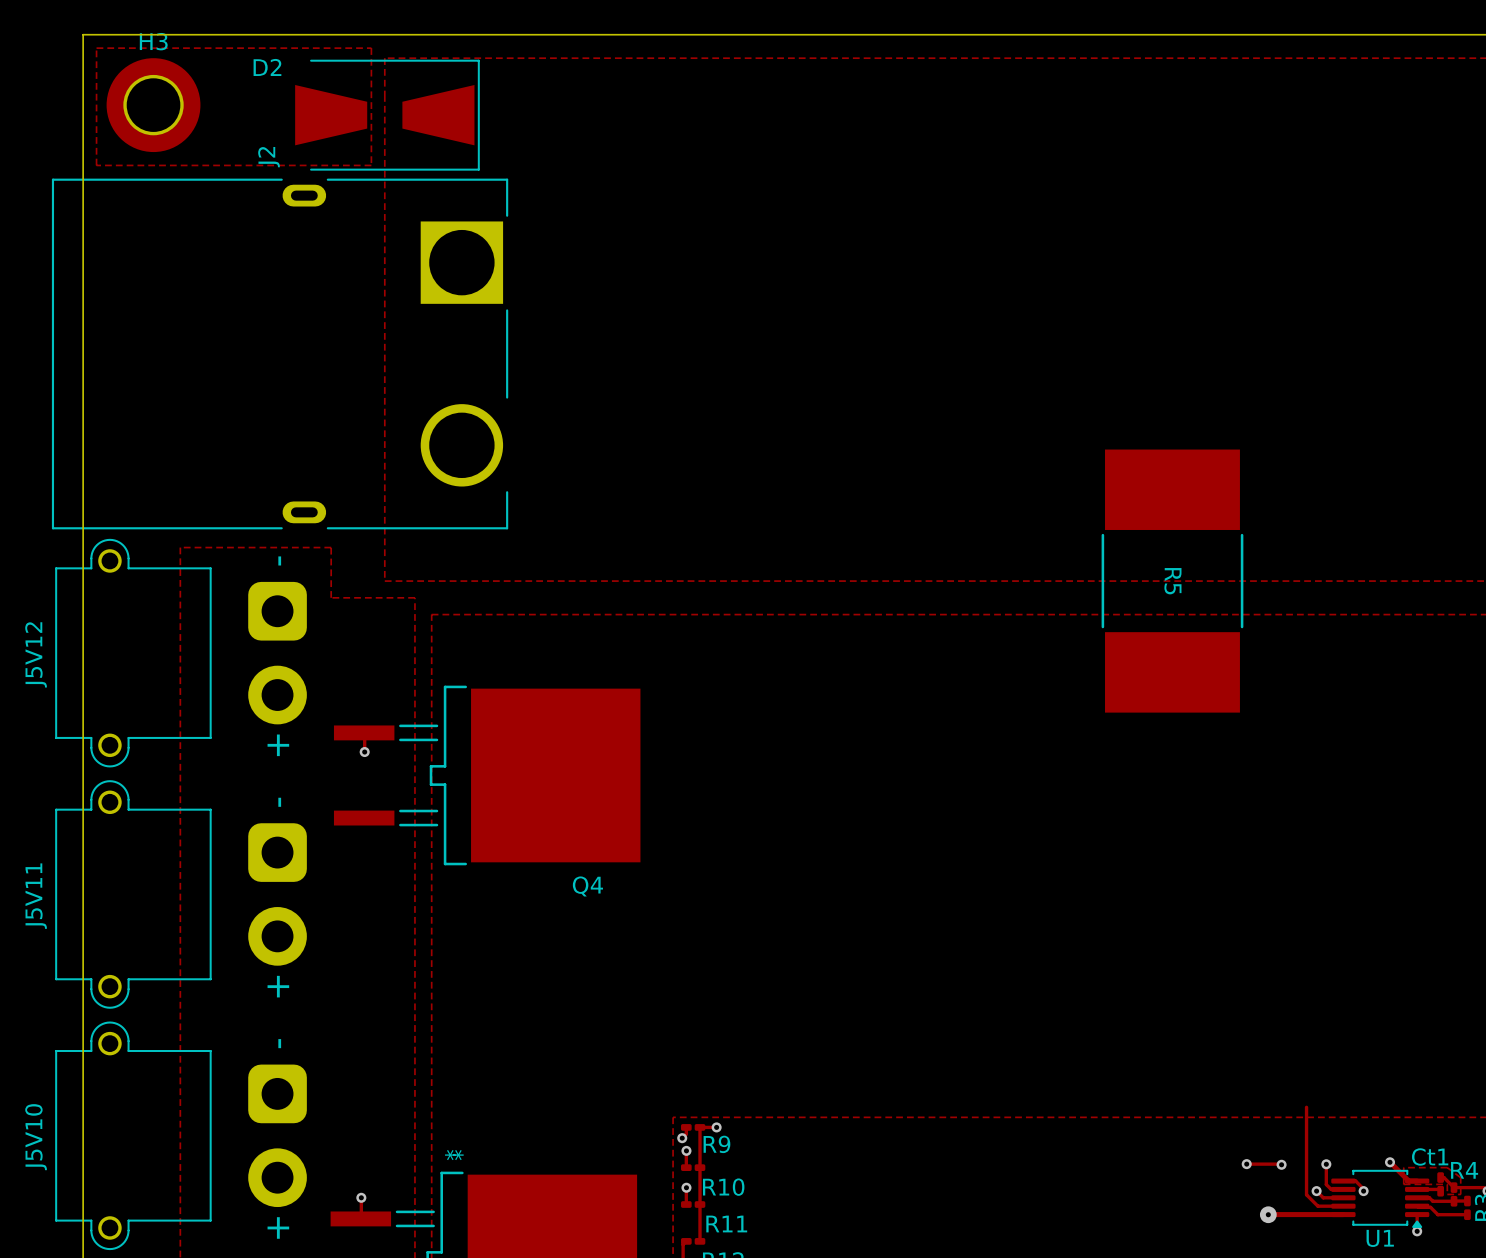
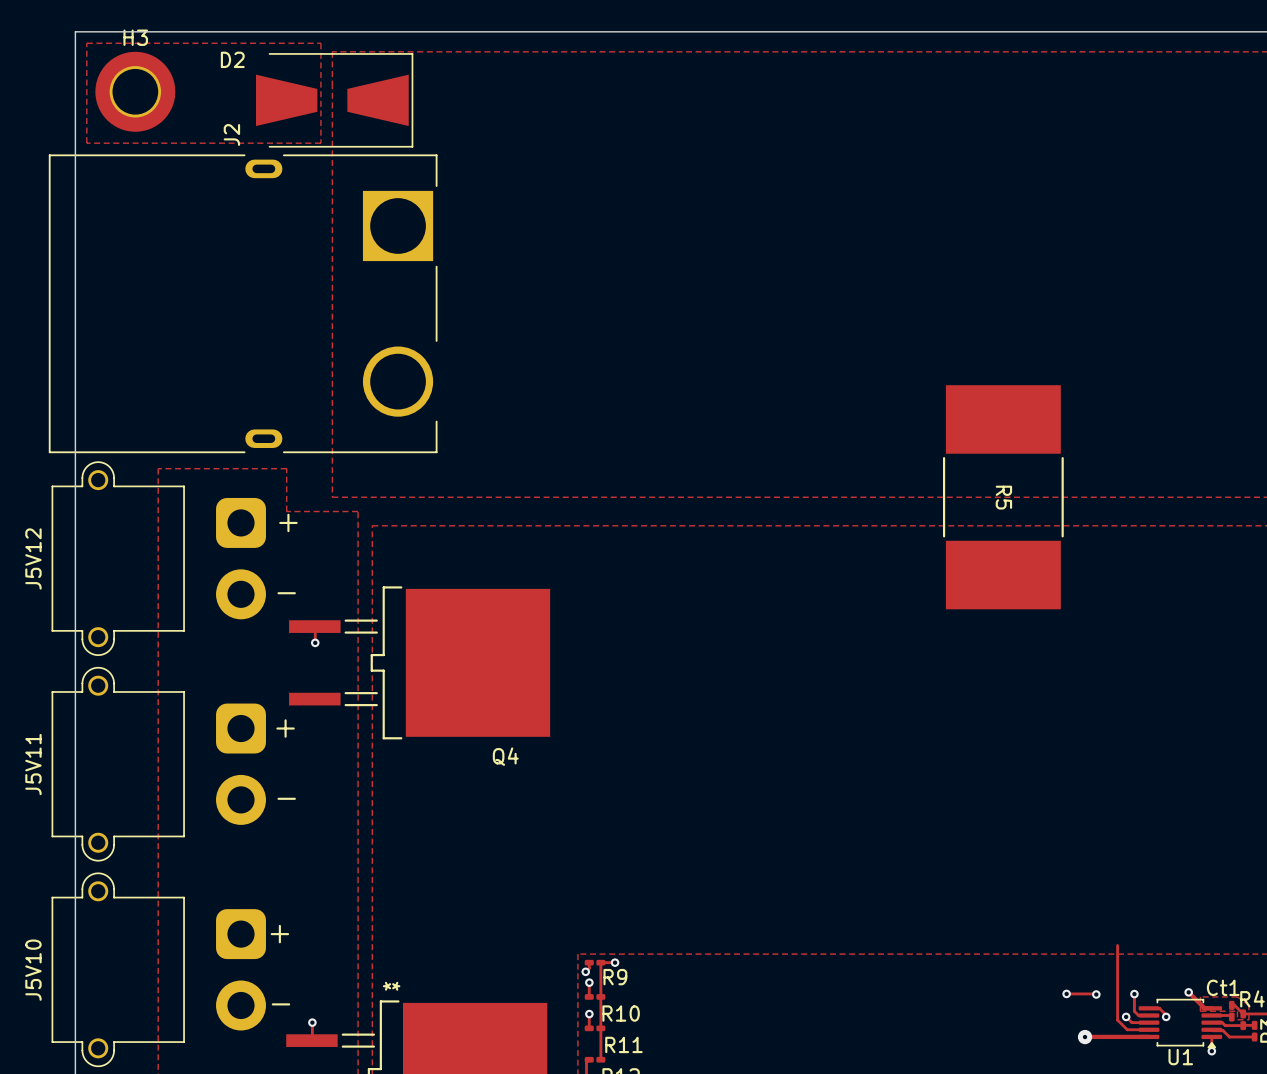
J5V12 text rotation: 0° (279, 560) -> 90° clockwise (286, 593)
J5V12 text position: - (279, 560) -> - (286, 593)
J5V12 text position: + (278, 745) -> + (288, 522)
J5V11 text rotation: 0° (279, 802) -> 90° clockwise (286, 798)
J5V11 text position: - (279, 802) -> - (286, 798)
J5V11 text position: + (278, 986) -> + (285, 728)
J5V10 text rotation: 0° (279, 1043) -> 90° clockwise (280, 1004)
J5V10 text position: - (279, 1043) -> - (280, 1004)
J5V10 text position: + (278, 1227) -> + (279, 934)

